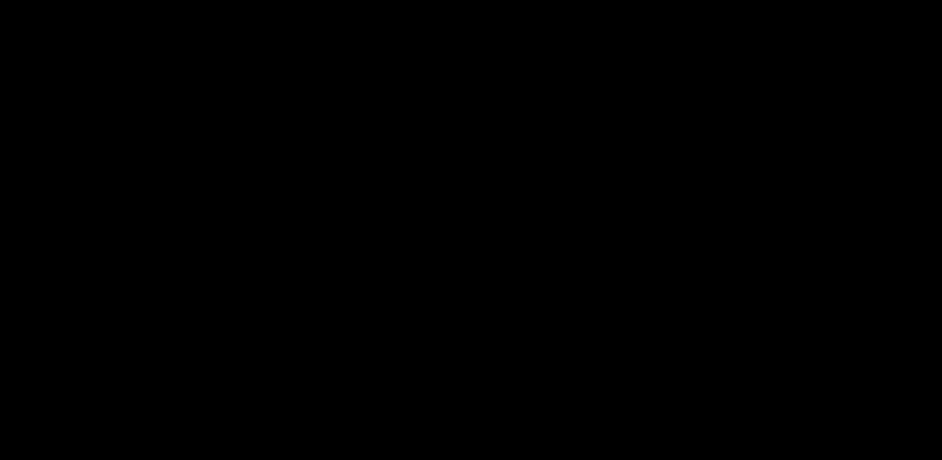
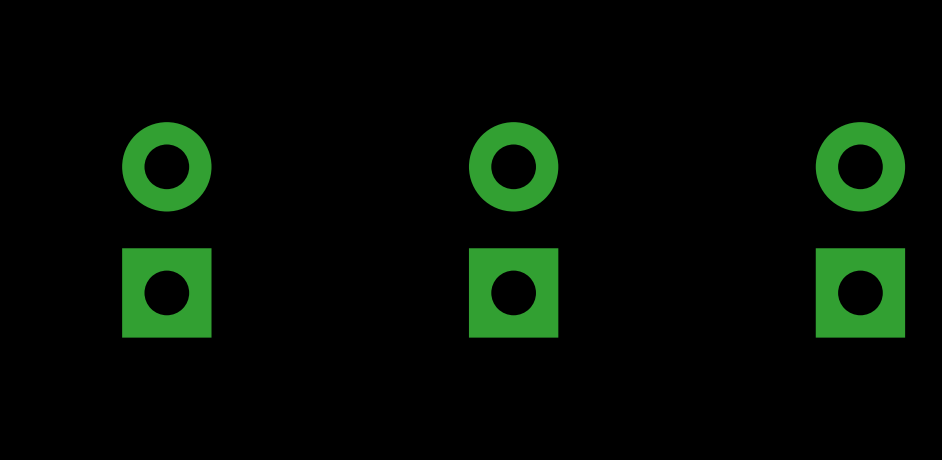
part: none -> (166, 229)
part: none -> (513, 229)
part: none -> (860, 229)

